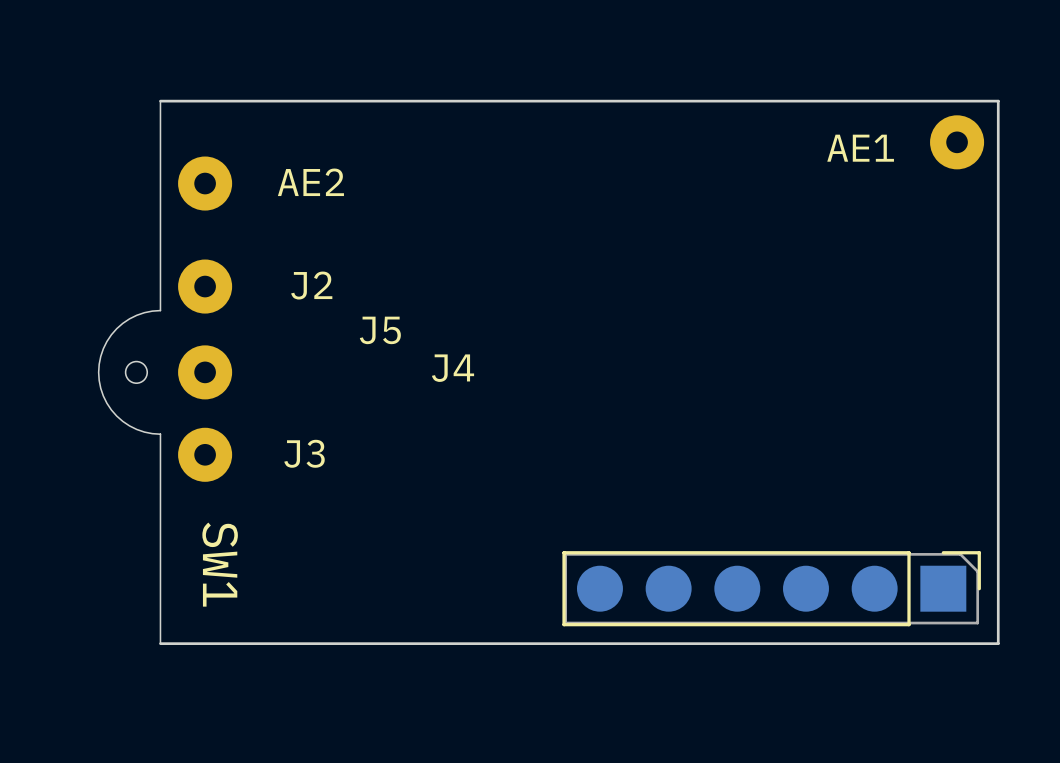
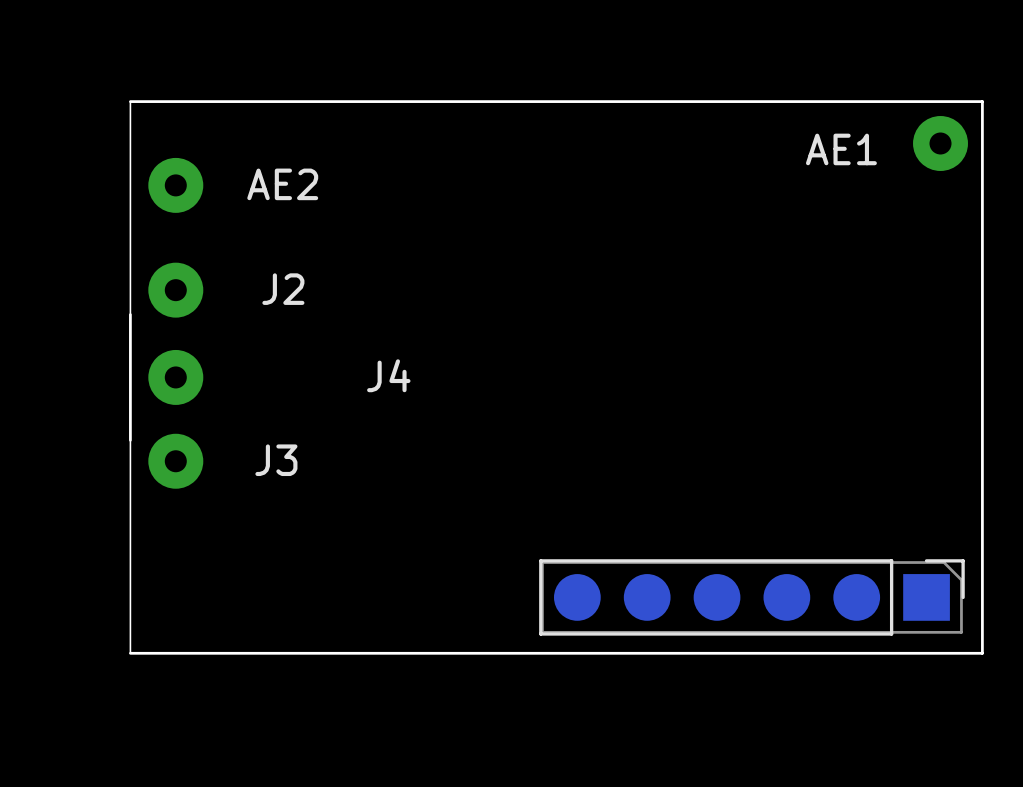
board edge: (160, 310) (136, 315) (116, 328) (103, 348) (98, 372) (103, 396) (116, 416) (136, 429) (160, 434) -> (130, 314) (130, 440)
J4 name position: J4 (453, 368) -> J4 (388, 375)
J5: (136, 372) -> none
SW1: (220, 564) -> none

